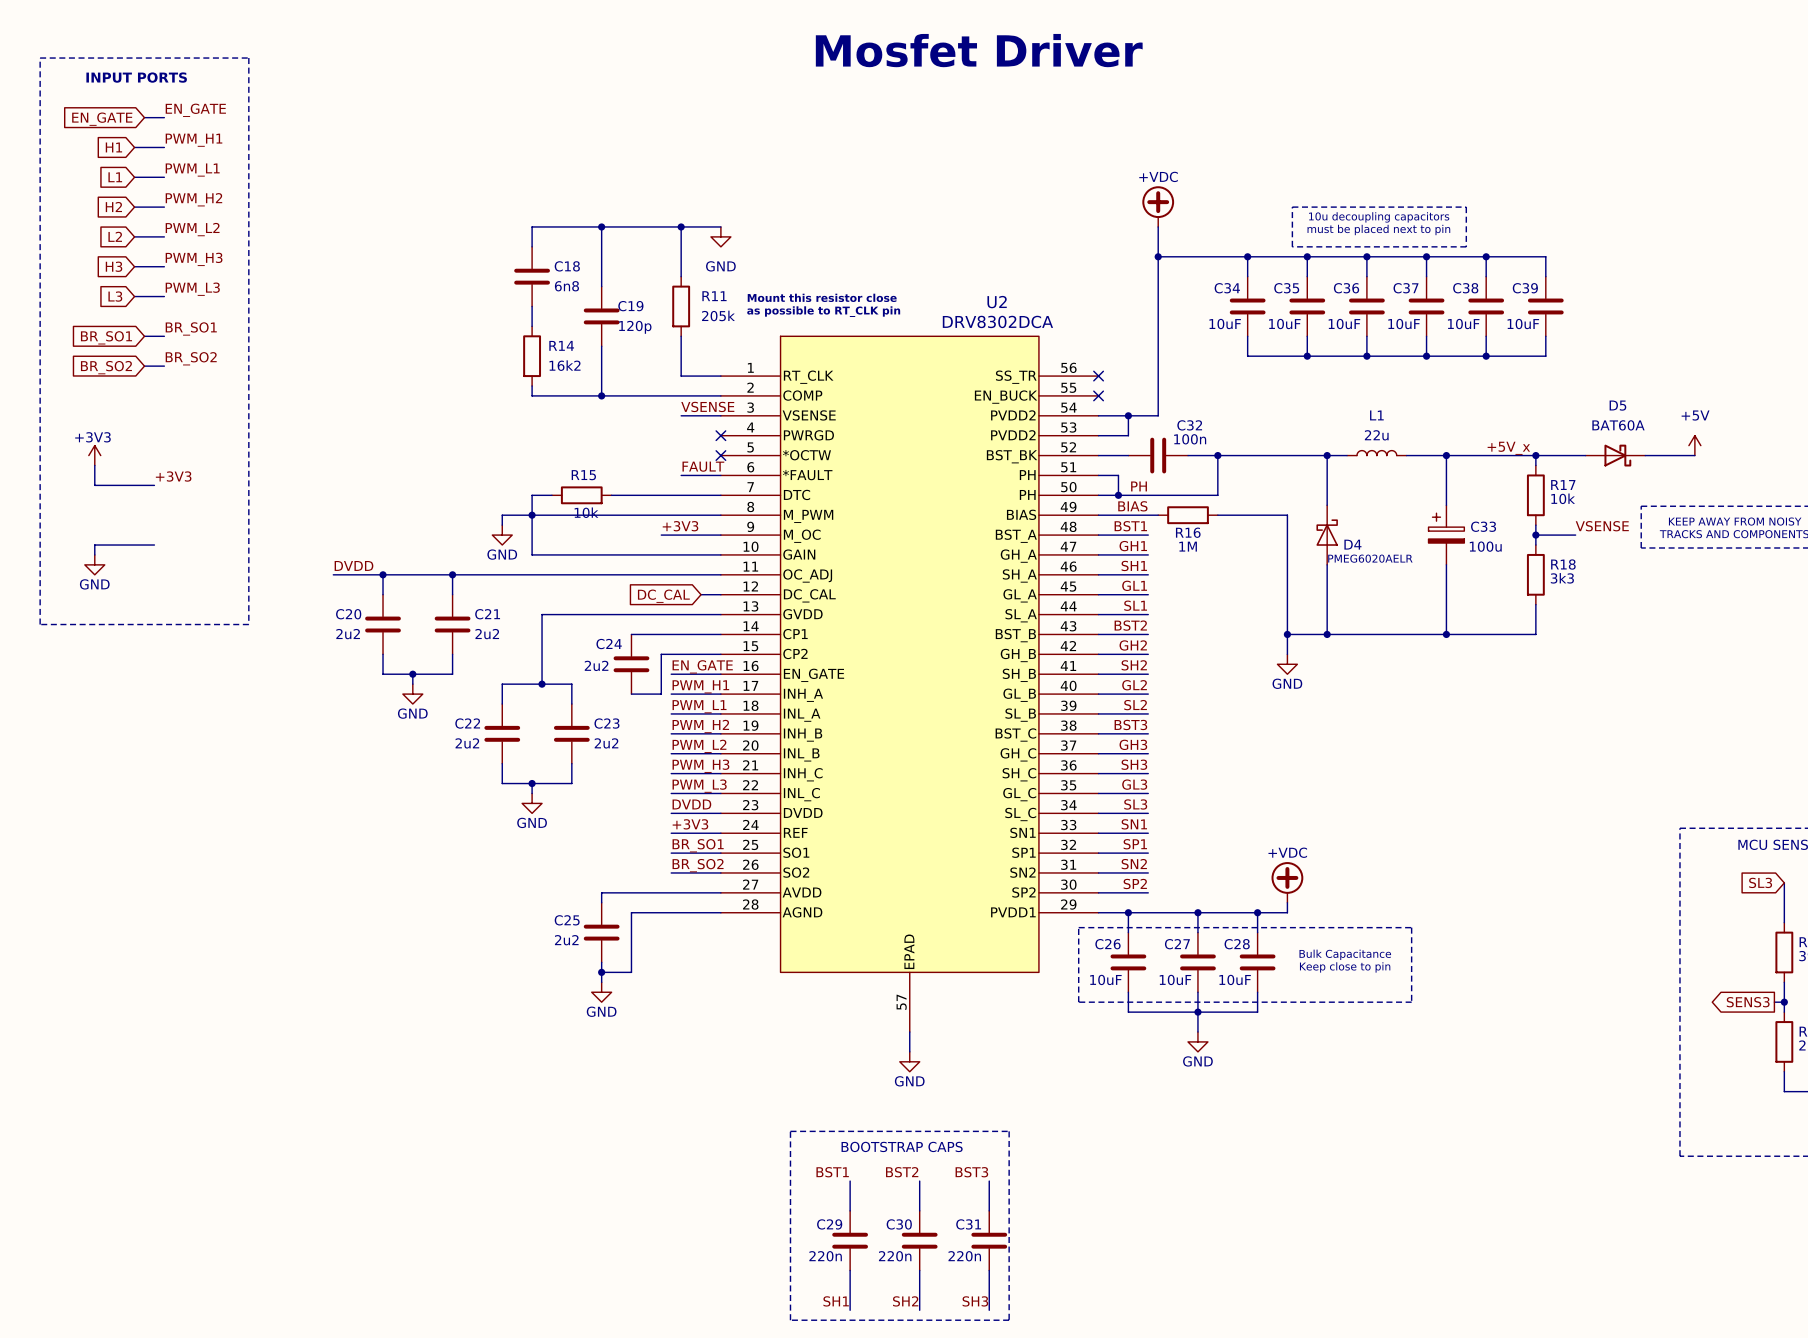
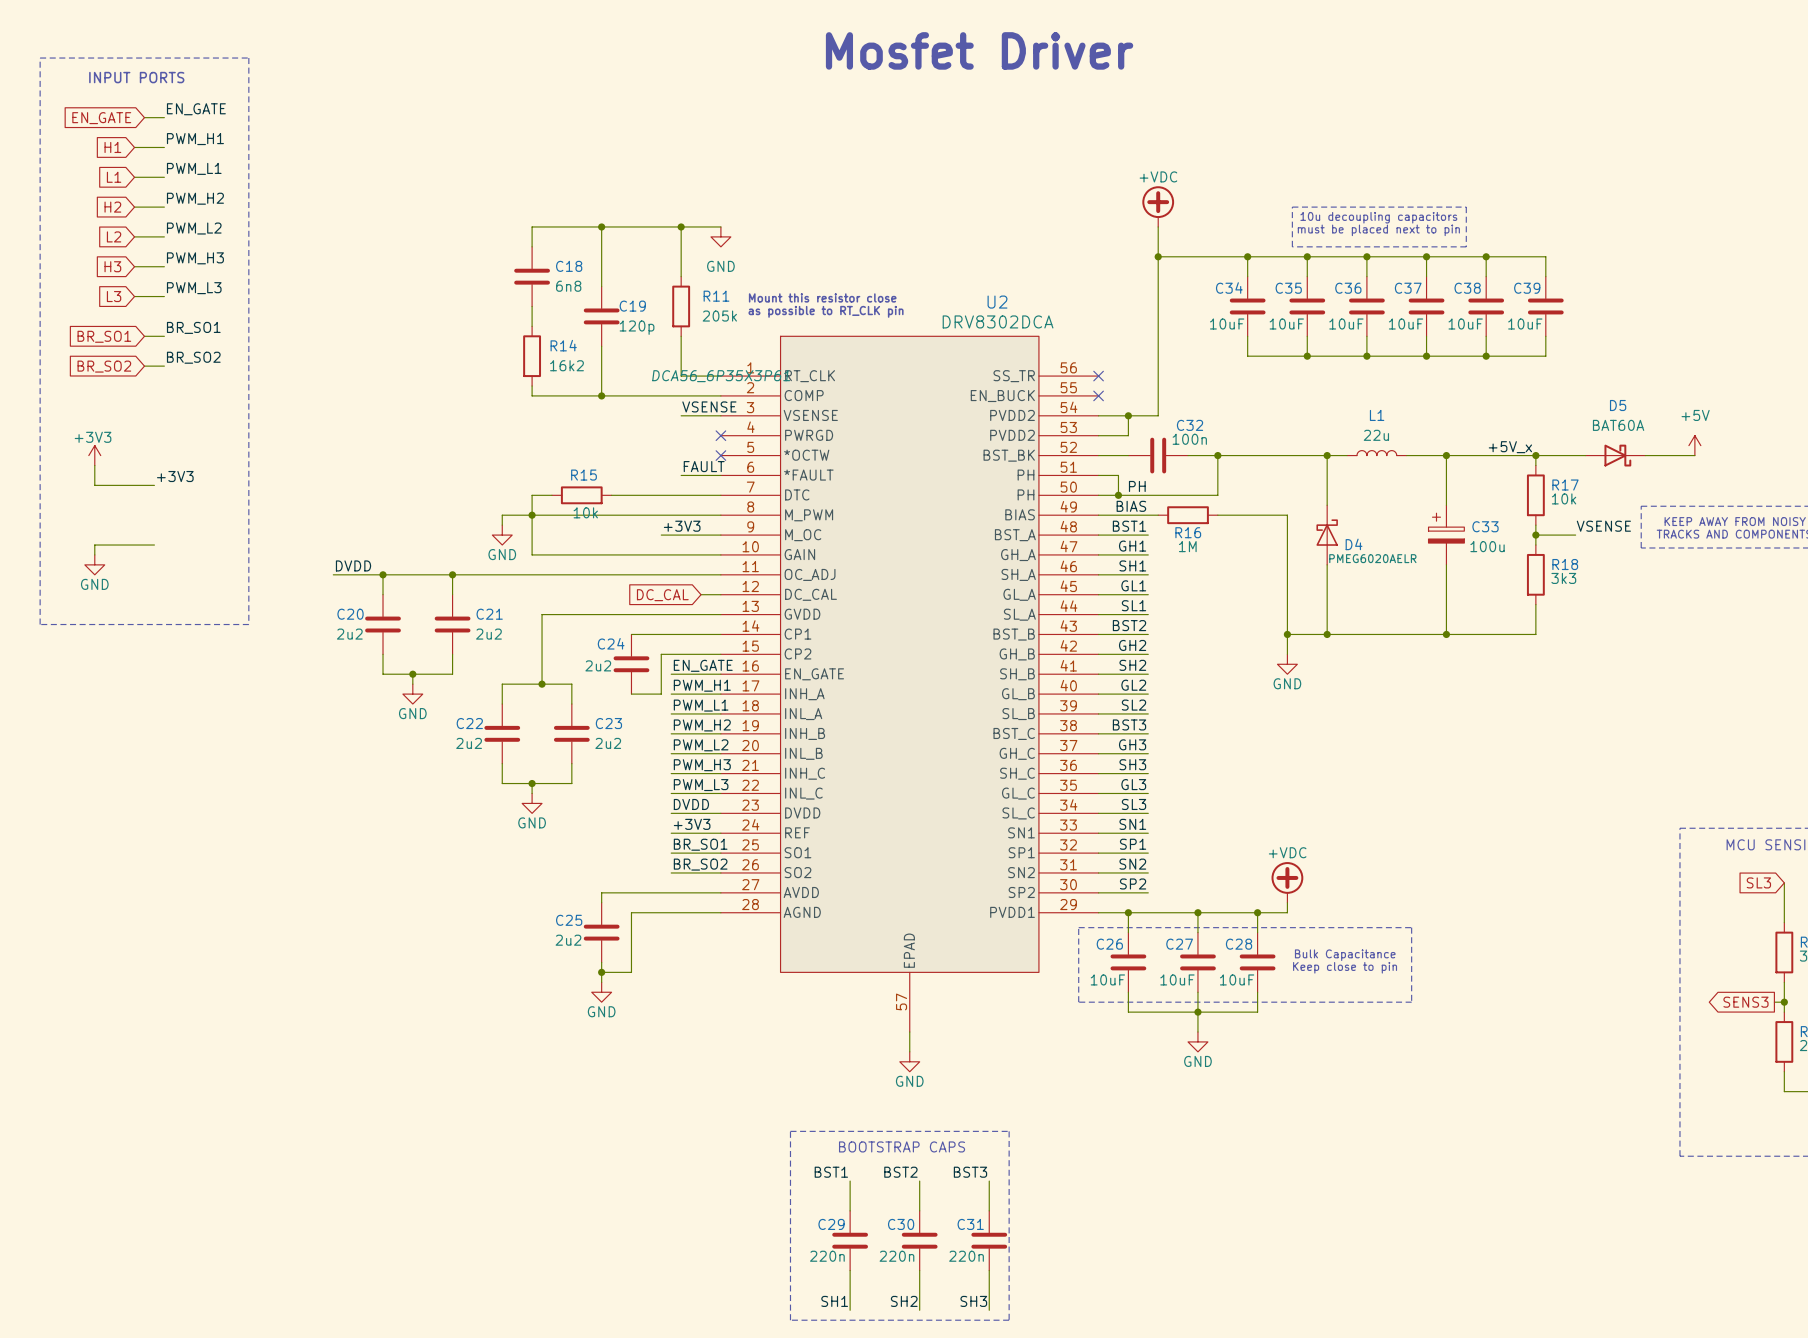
U2 text: none -> DCA56_6P35X3P61 (721, 376)

